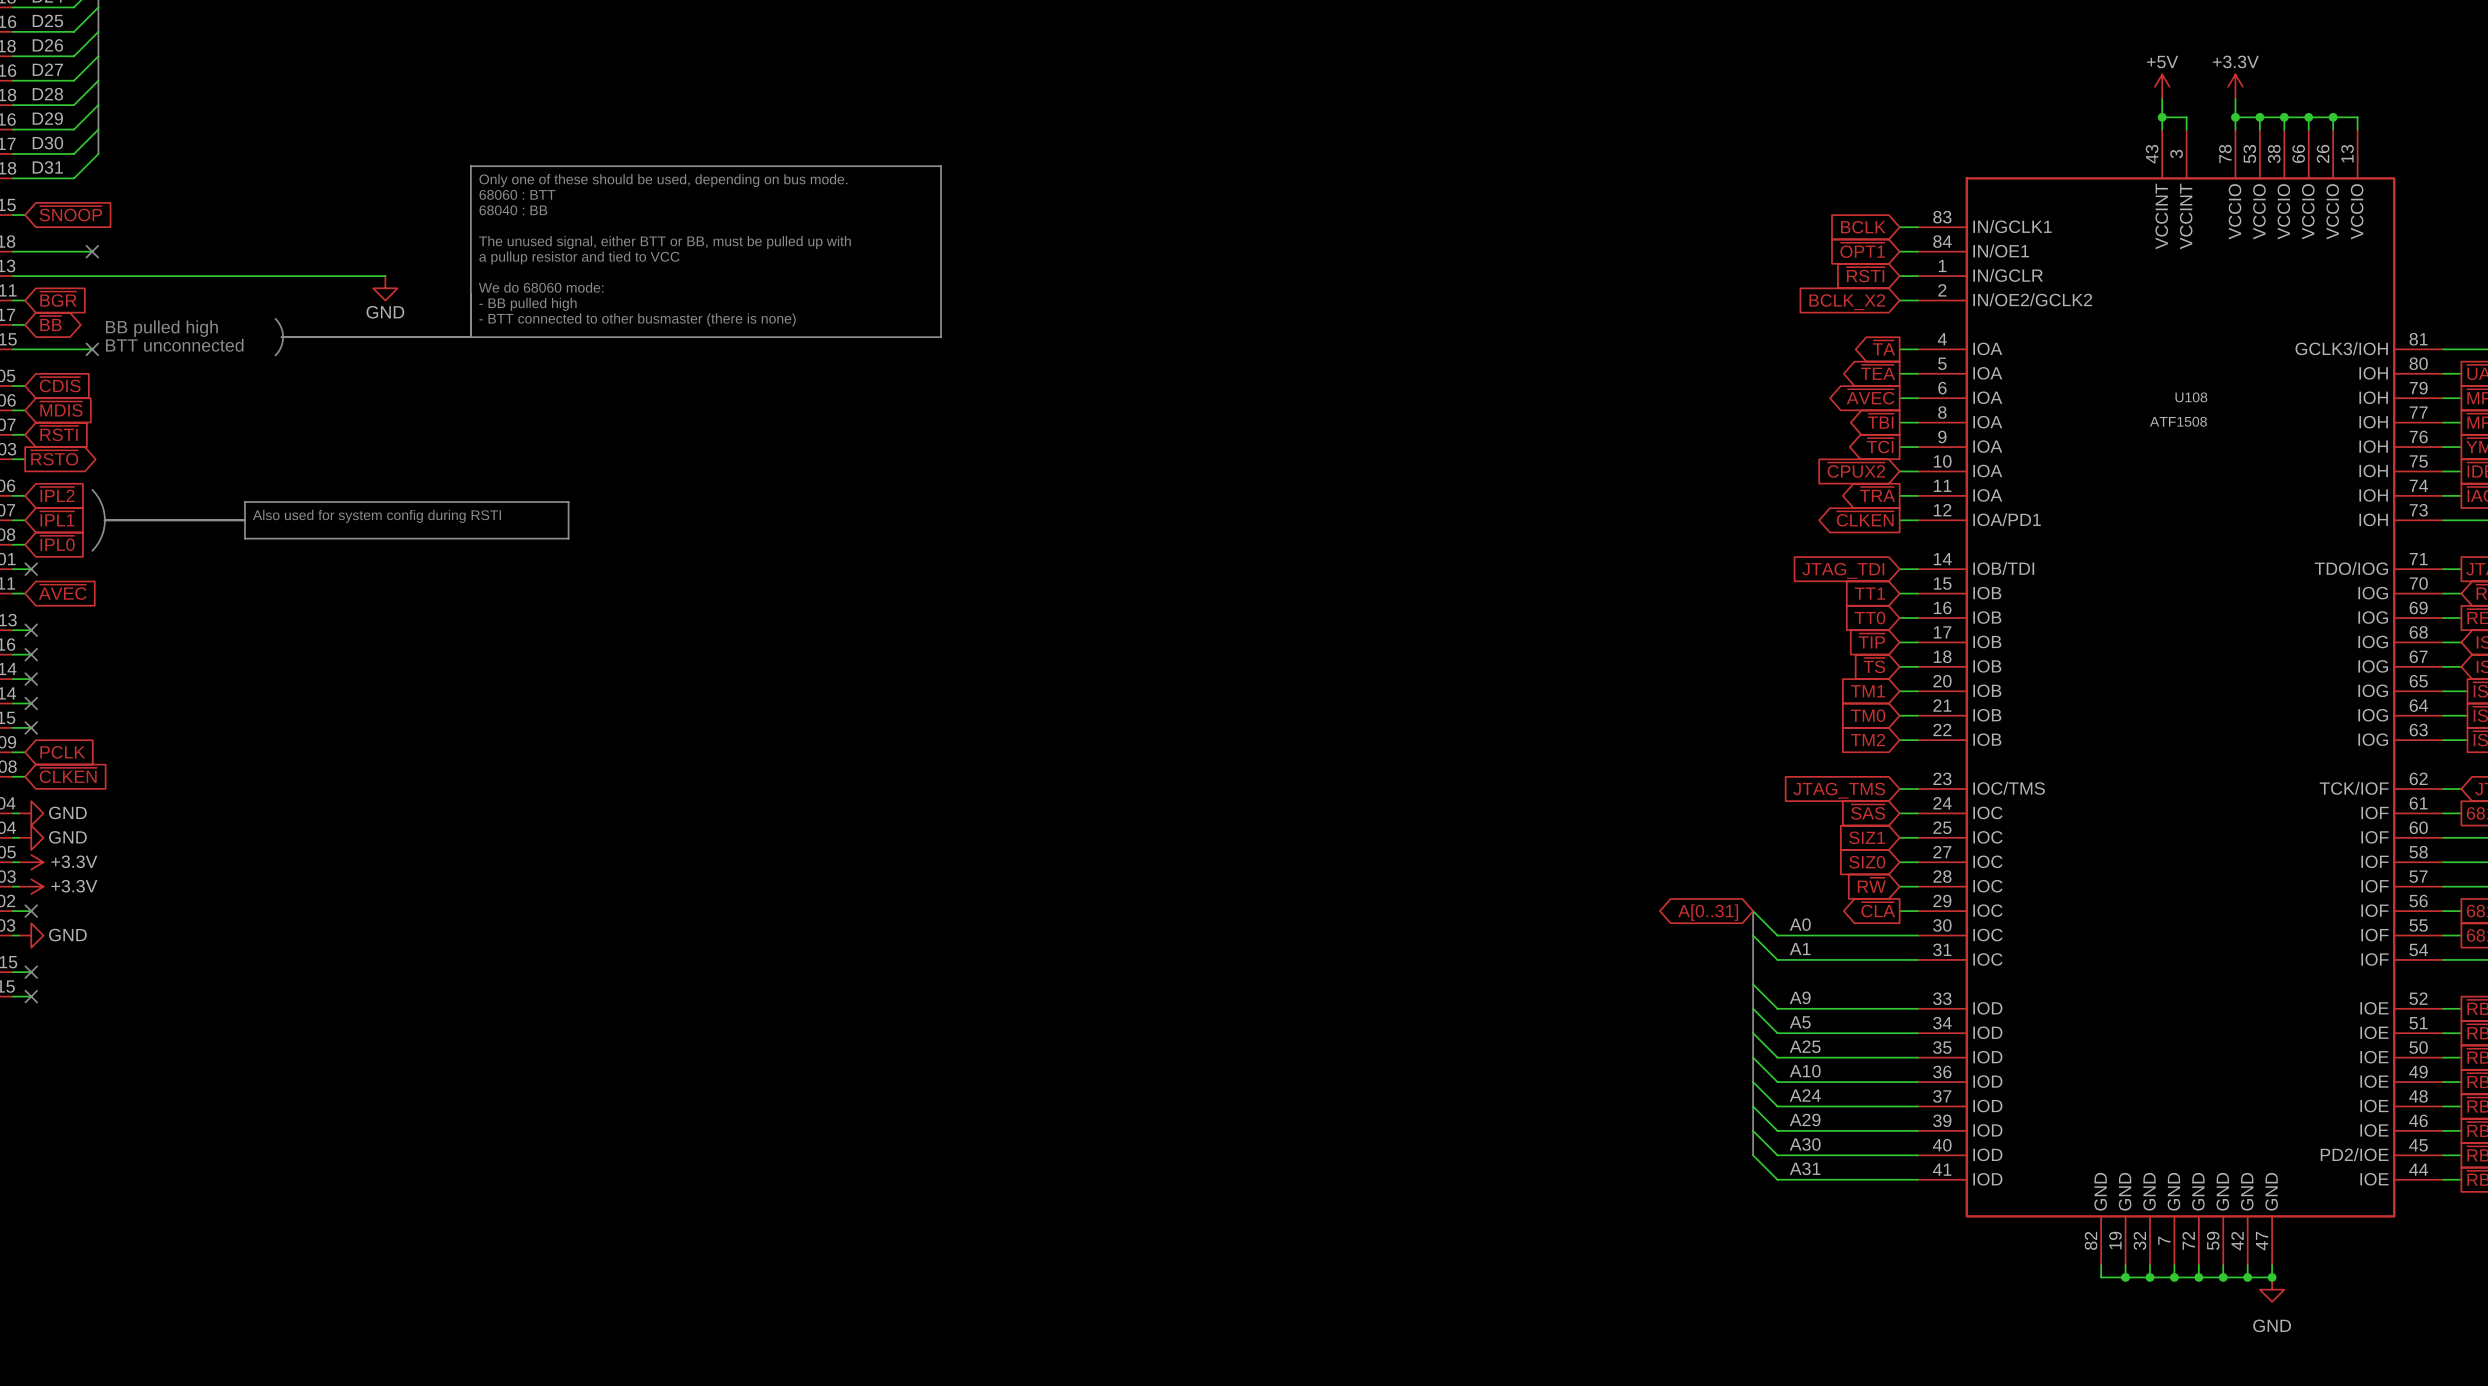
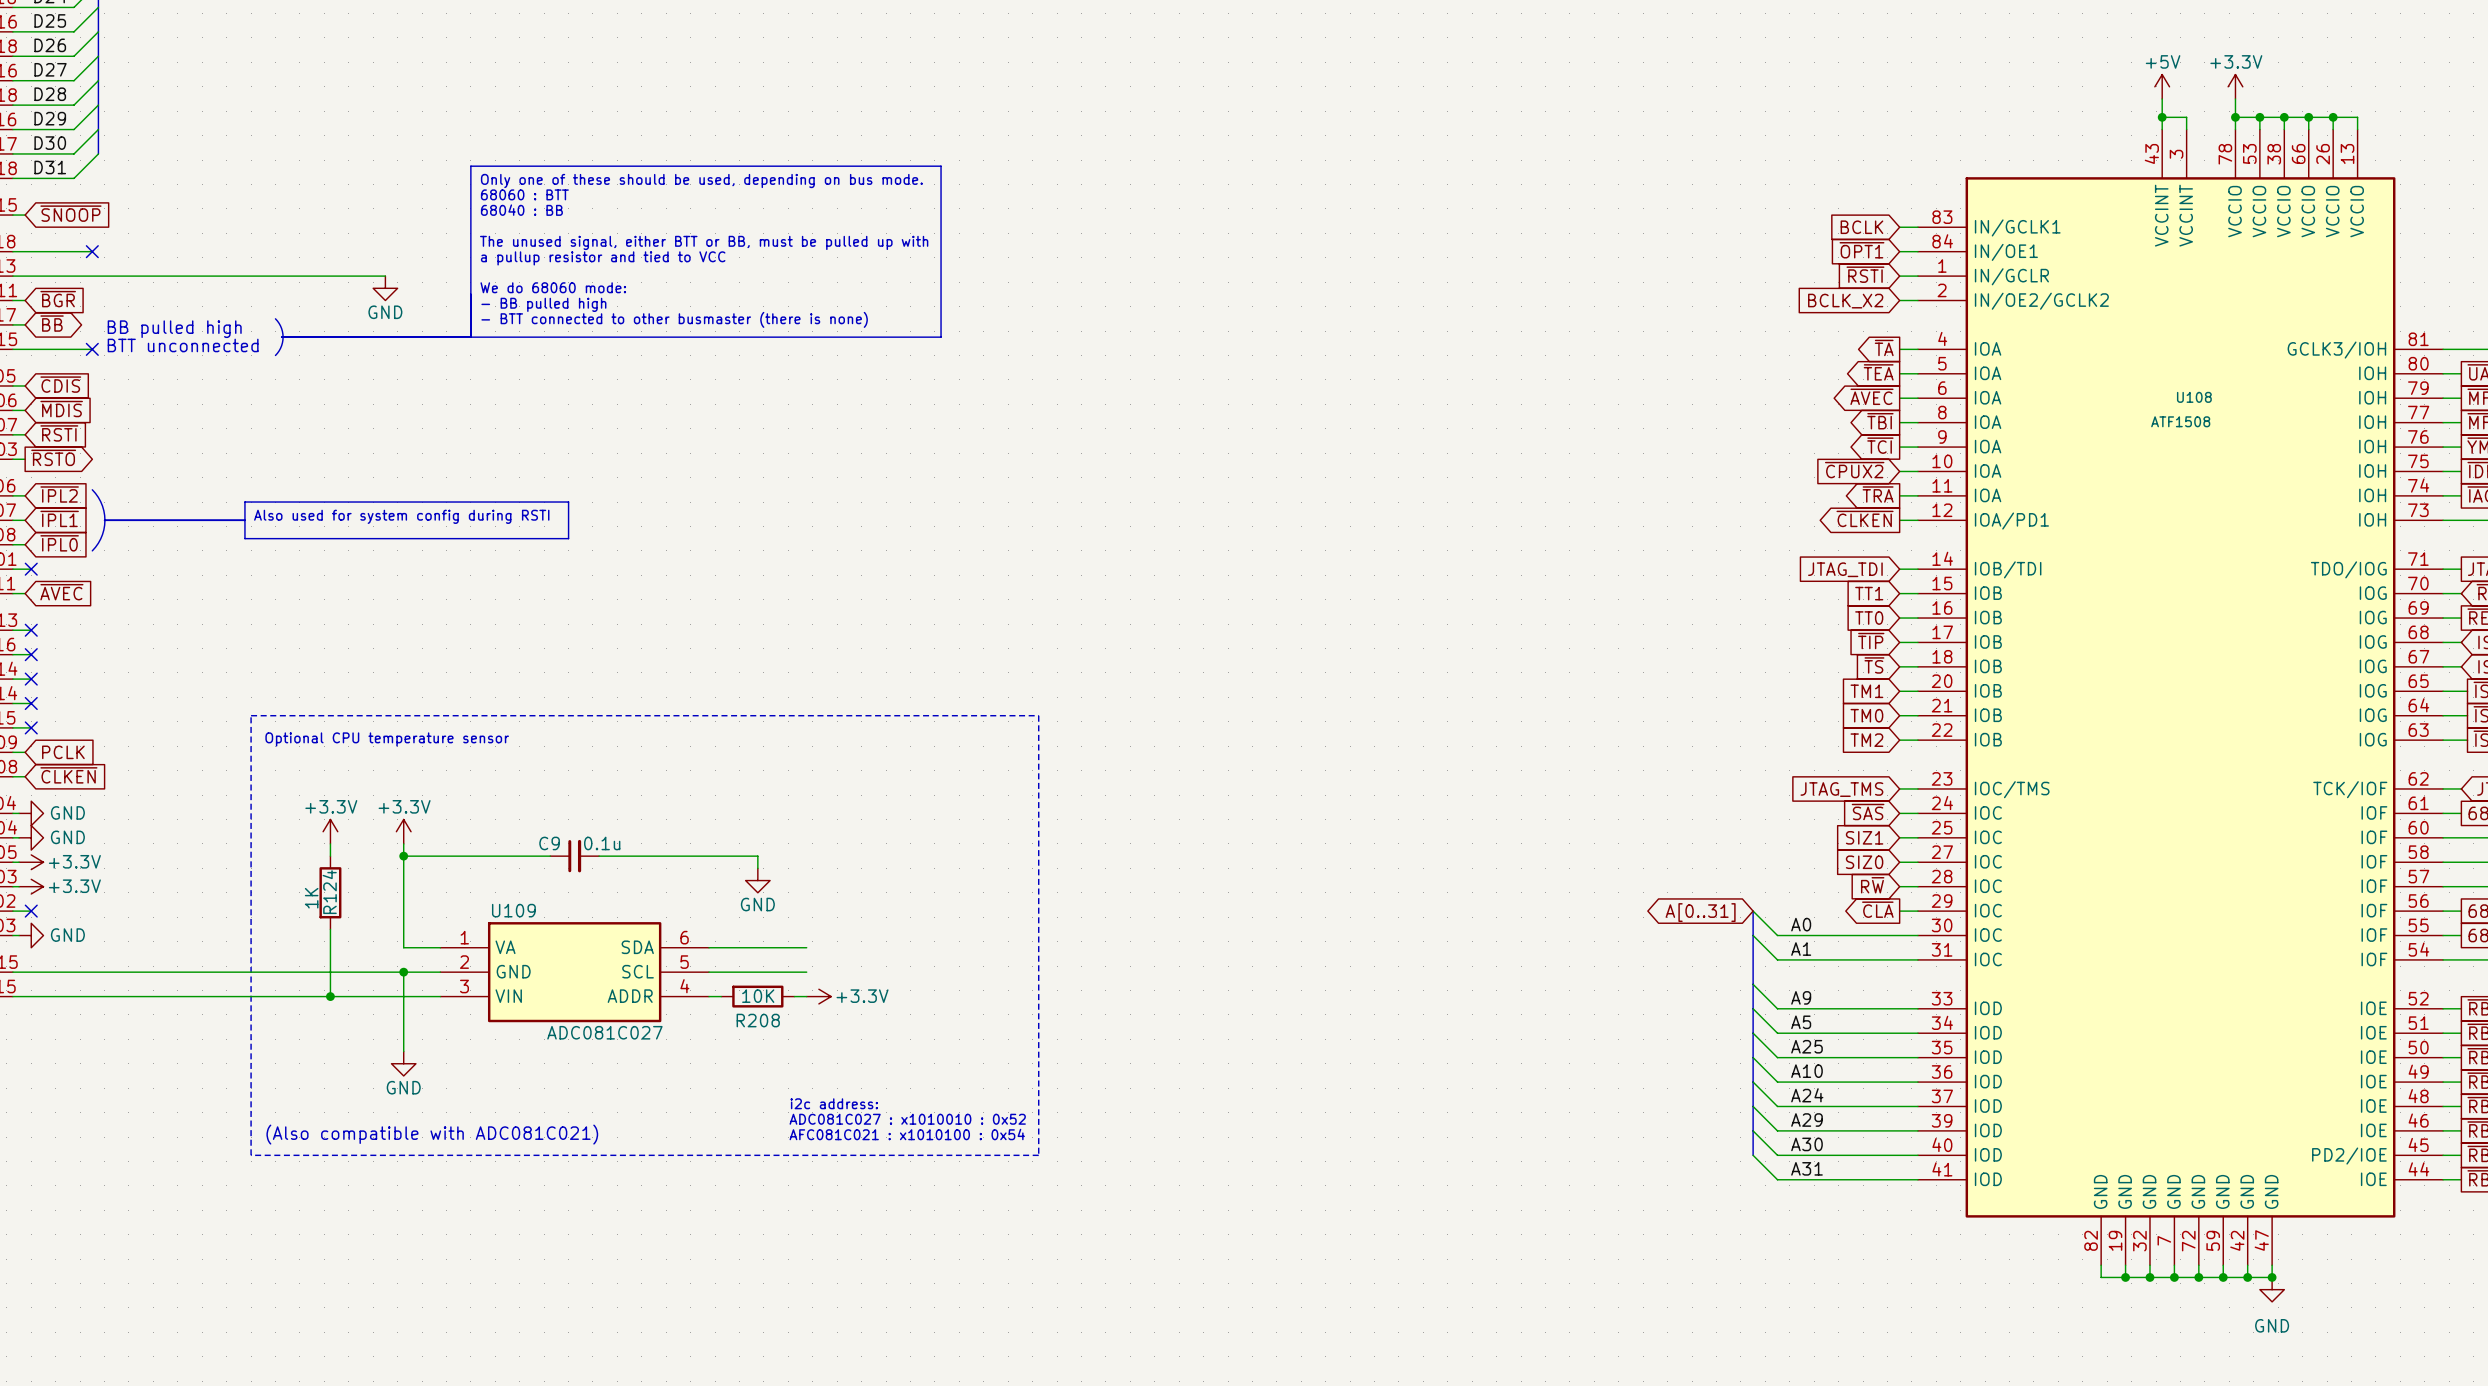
line: none -> (251, 715) (1038, 715) (1038, 1155) (251, 1155) (251, 715)
text: none -> Optional CPU temperature sensor (387, 739)
power symbol: none -> +3.3V (330, 831)
power symbol: none -> +3.3V (403, 831)
wire: none -> (330, 843) (330, 856)
wire: none -> (403, 843) (403, 947) (440, 947)
wire: none -> (403, 856) (550, 856)
junction: none -> (403, 856)
C9: none -> 0.1u (574, 856)
wire: none -> (599, 856) (757, 856) (757, 868)
power symbol: none -> GND (757, 880)
R124: none -> 1K (330, 892)
wire: none -> (330, 929) (330, 996)
wire: none -> (709, 947) (806, 947)
wire: none -> (31, 972) (440, 972)
no-connect mark: (31, 972) -> none
wire: none -> (403, 972) (403, 1051)
junction: none -> (403, 972)
U109: none -> ADC081C027 (574, 972)
wire: none -> (709, 972) (806, 972)
wire: none -> (31, 996) (440, 996)
no-connect mark: (31, 996) -> none
junction: none -> (330, 996)
wire: none -> (709, 996) (721, 996)
R208: none -> 10K (757, 996)
wire: none -> (794, 996) (806, 996)
power symbol: none -> +3.3V (818, 996)
power symbol: none -> GND (403, 1063)
text: none -> i2c address: (834, 1103)
text: none -> ADC081C027 : x1010010 : 0x52 (907, 1119)
text: none -> (Also compatible with ADC081C021) (432, 1134)
text: none -> AFC081C021 : x1010100 : 0x54 (907, 1134)

